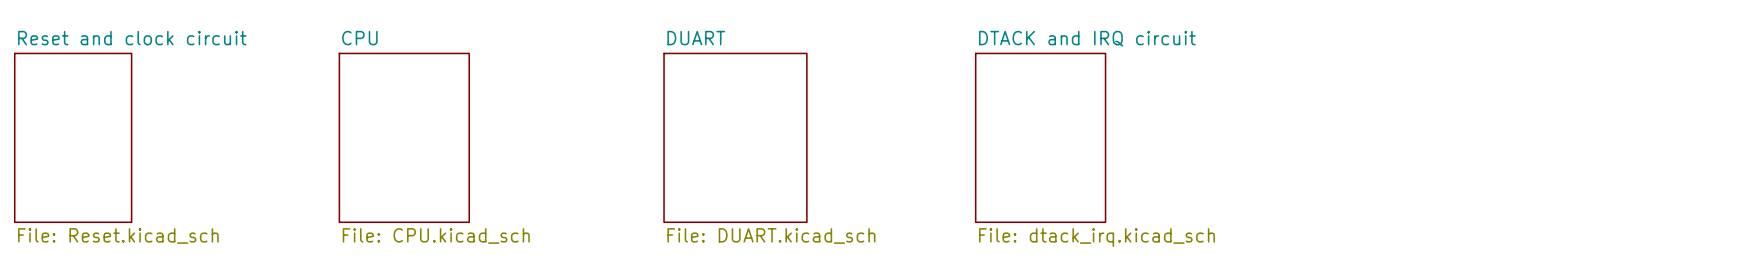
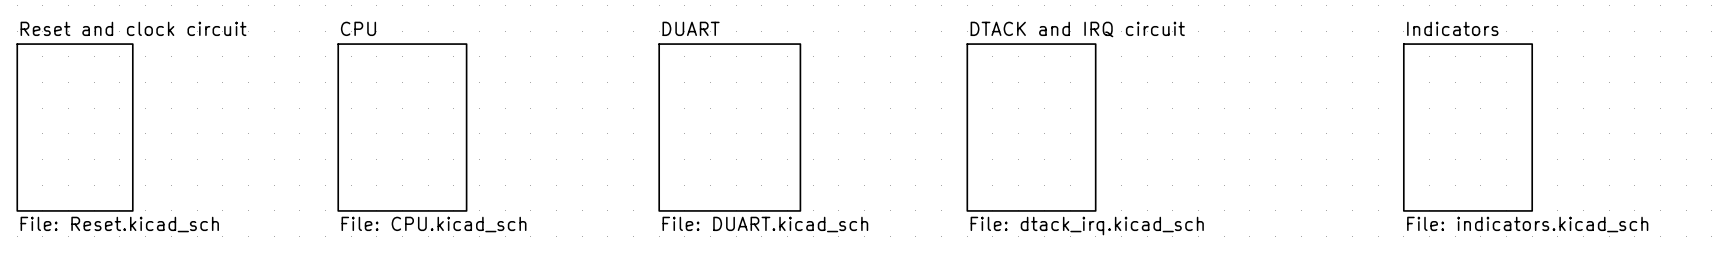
sheet Indicators: none -> File: indicators.kicad_sch (1468, 127)

